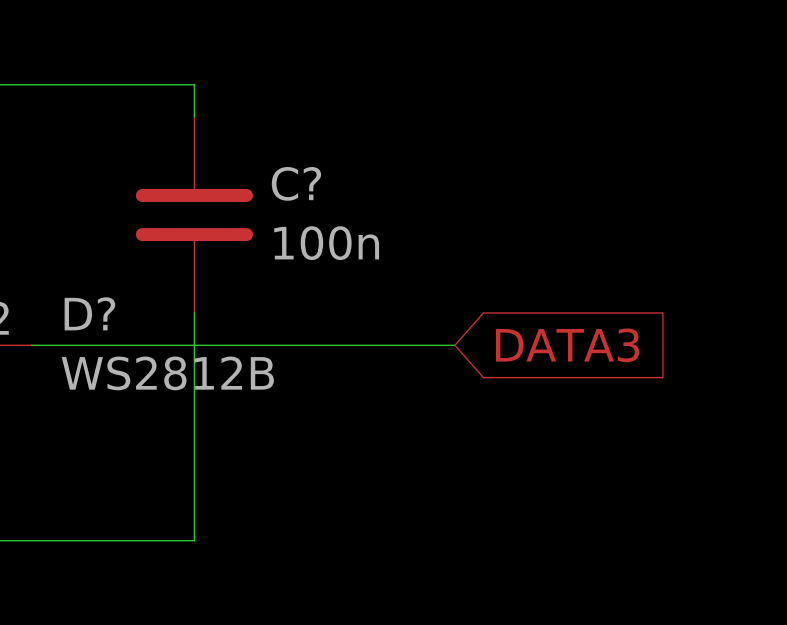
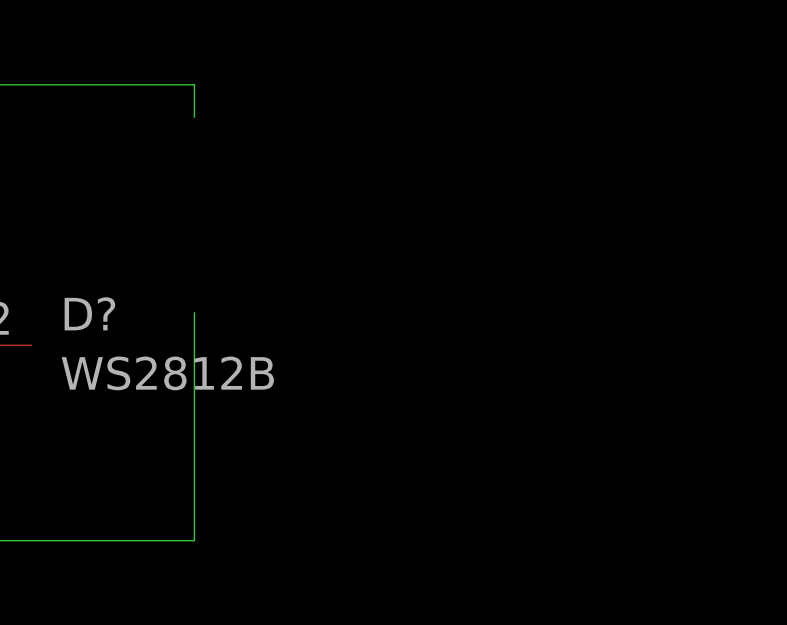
C?: 100n (194, 215) -> none
wire: (31, 345) (454, 345) -> none
global label: DATA3 (567, 345) -> none

